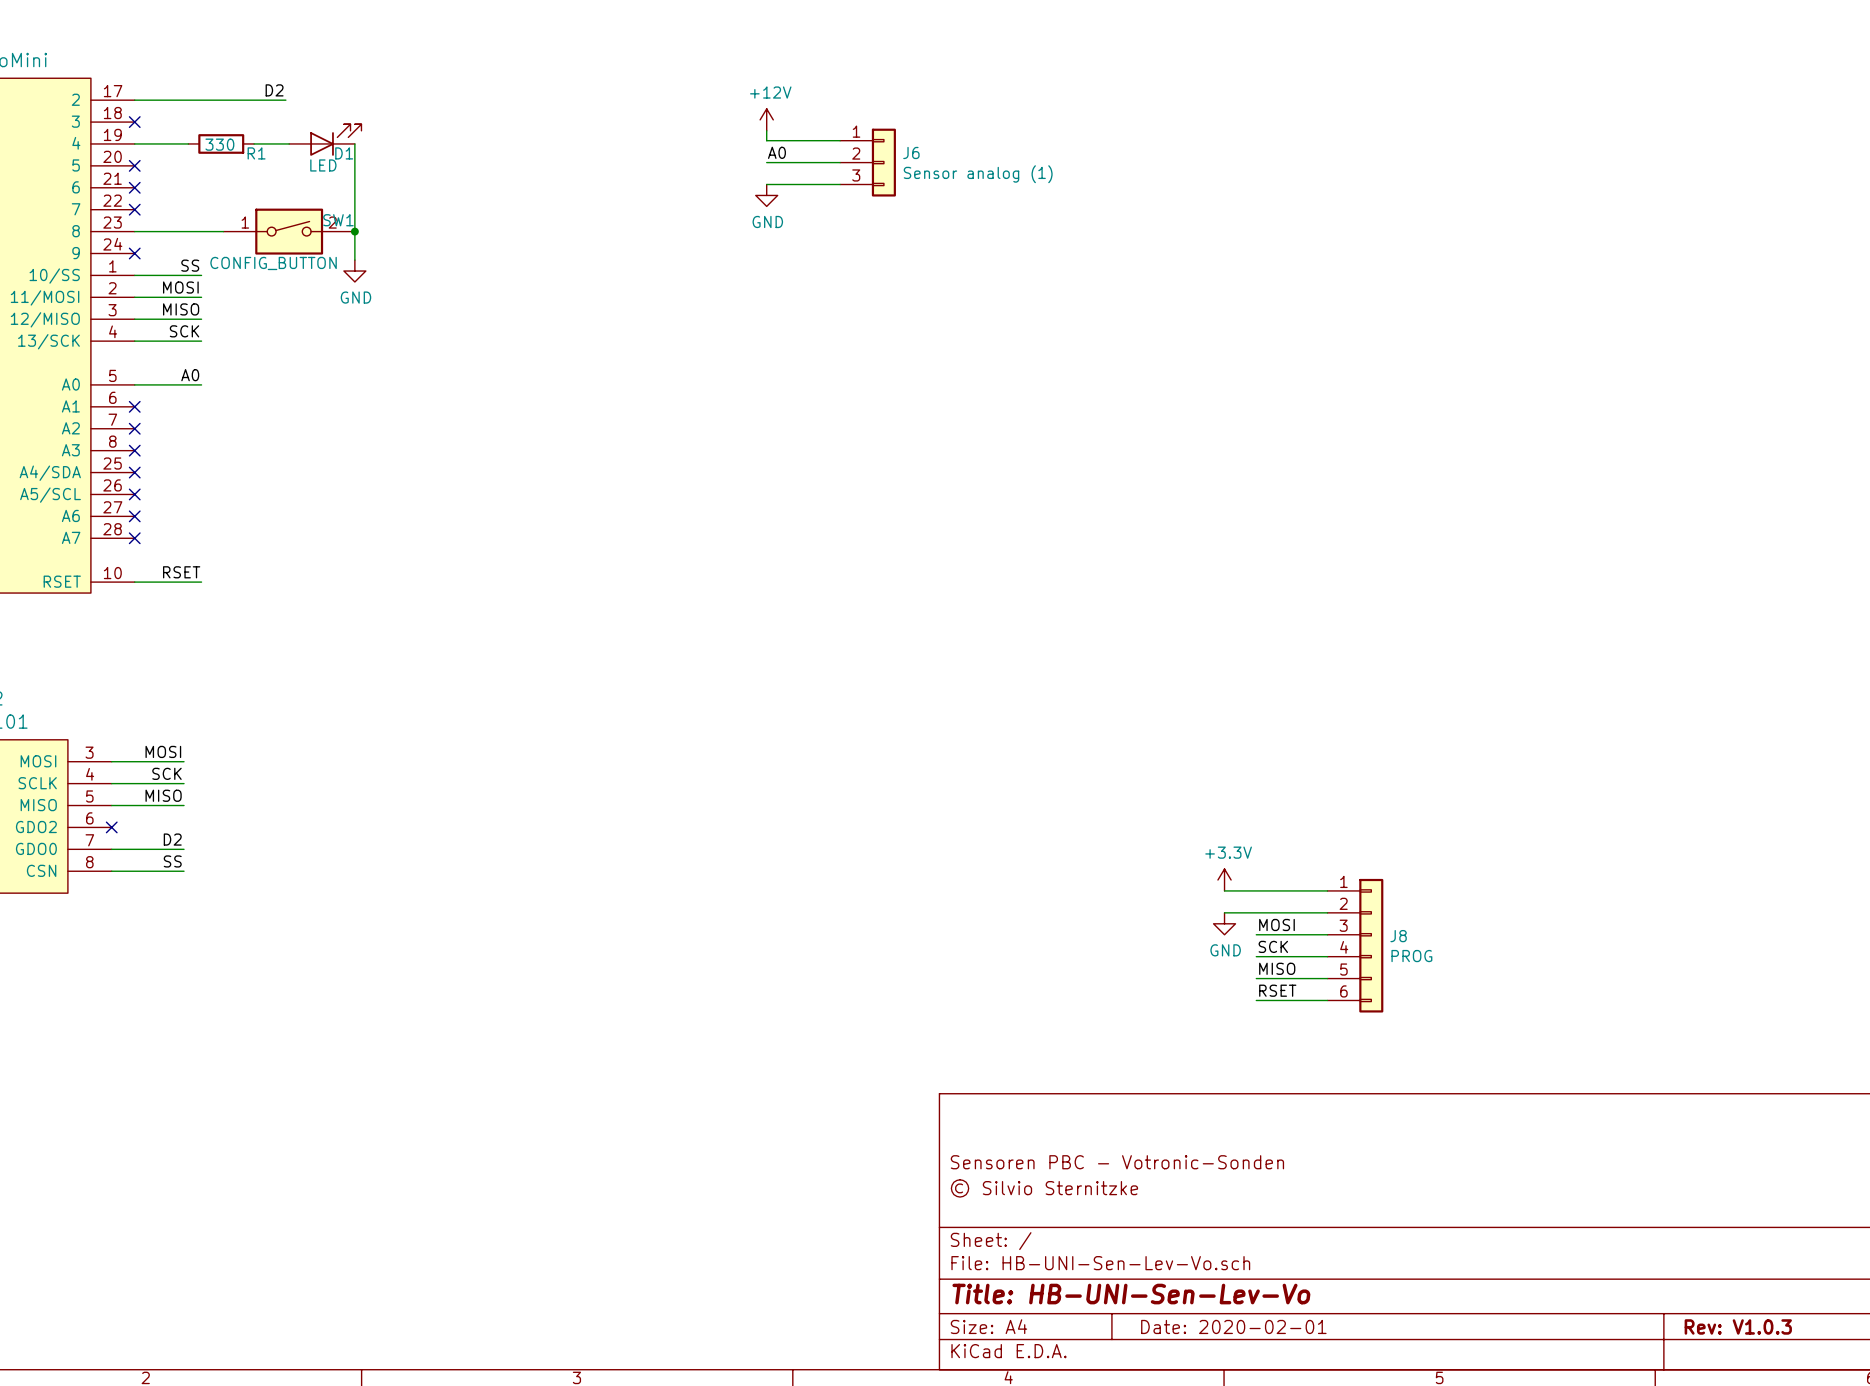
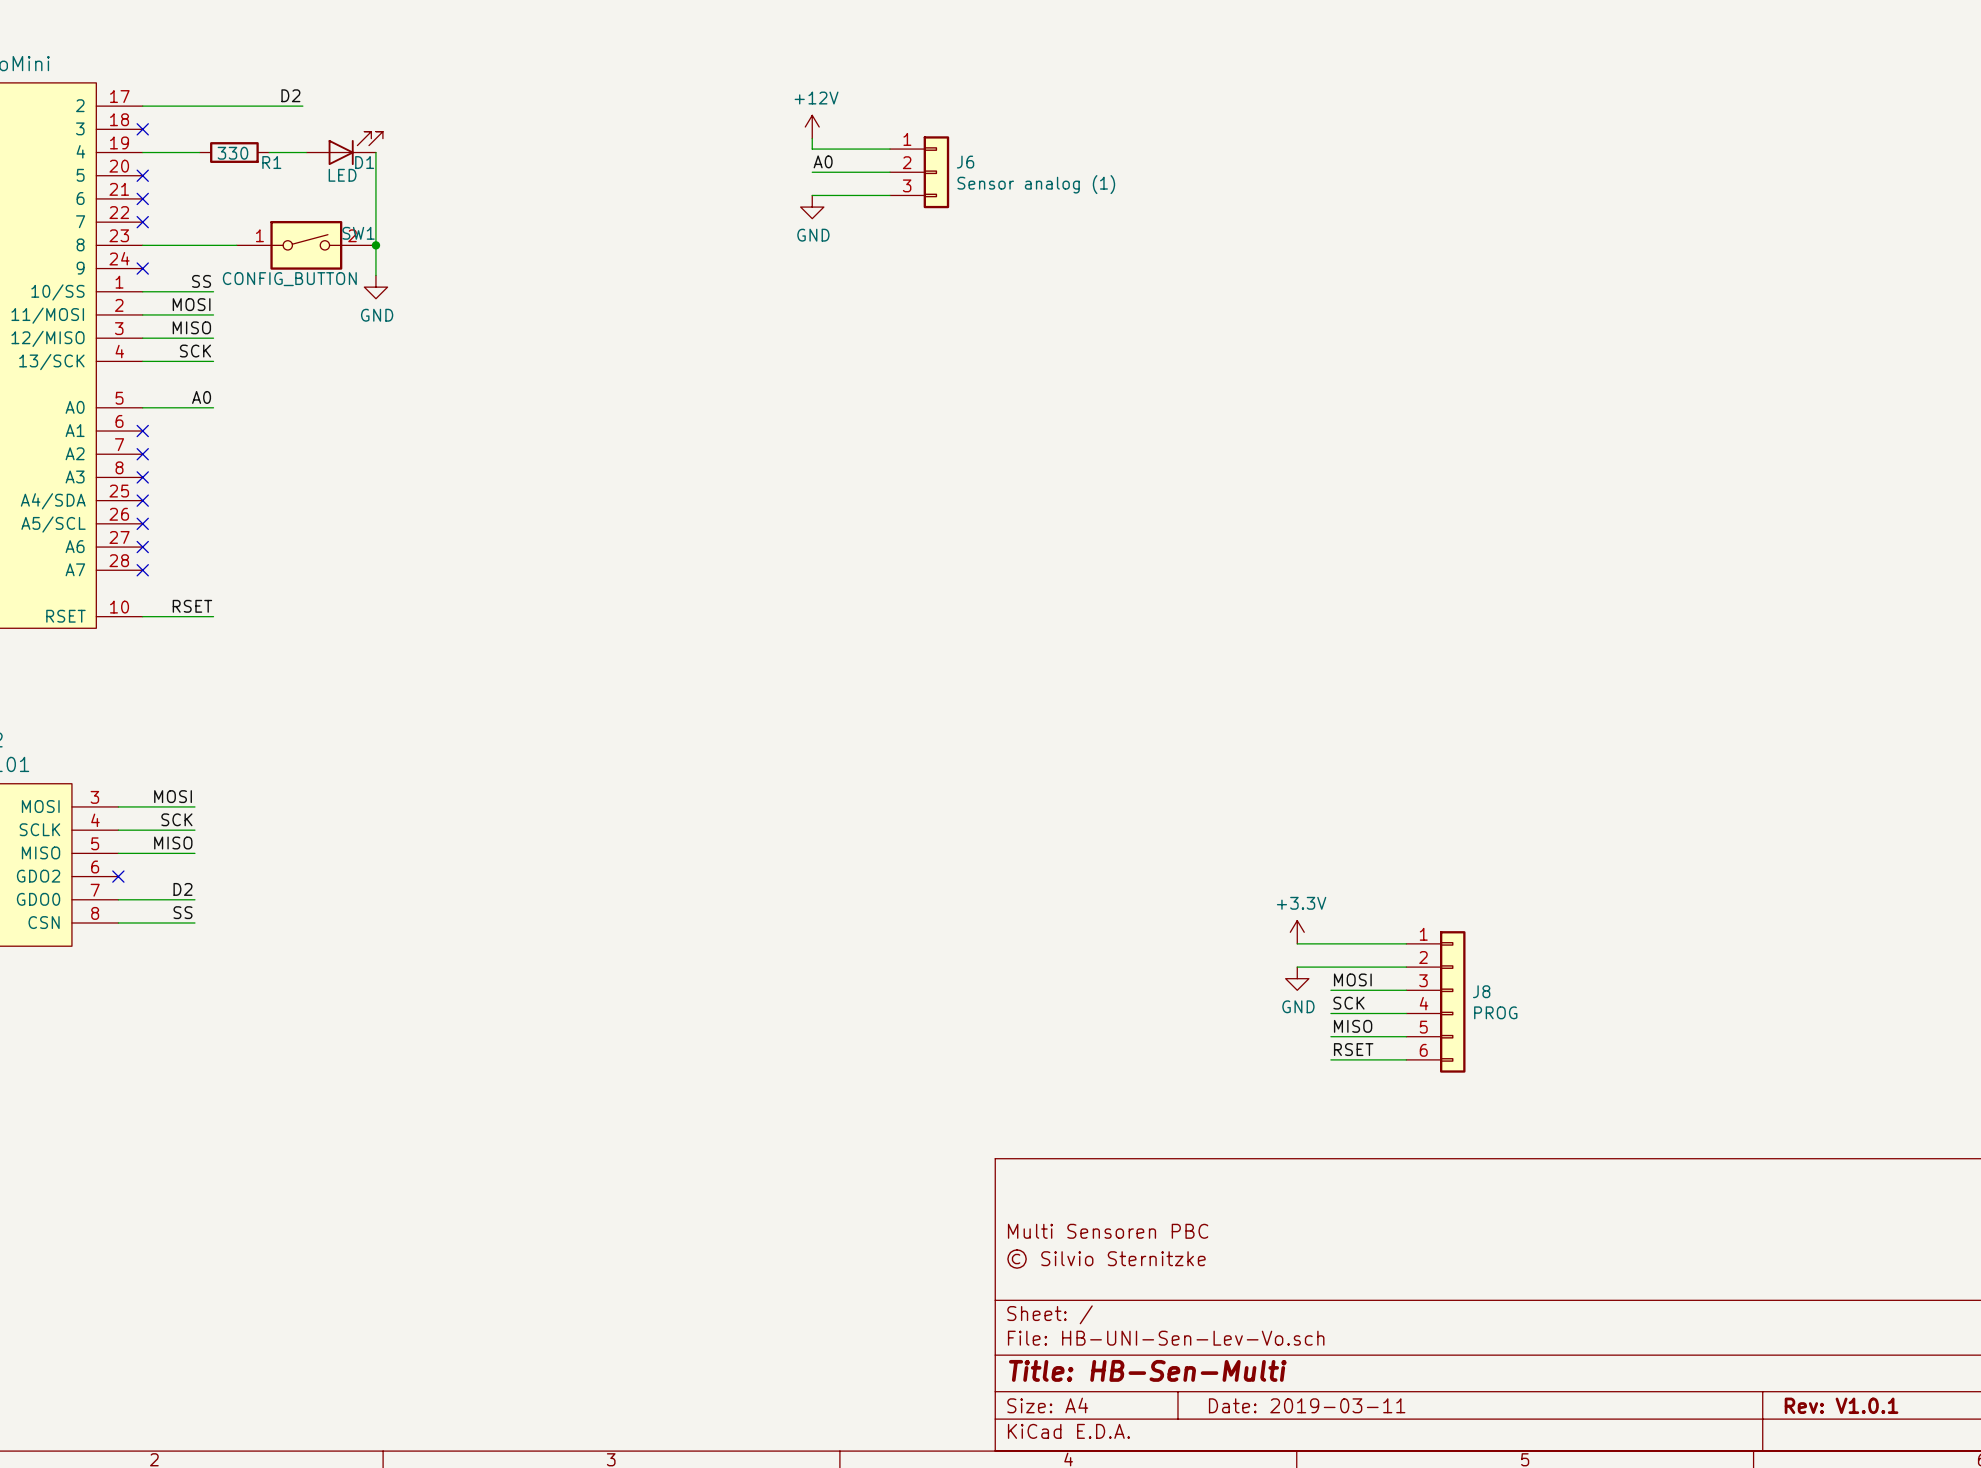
title block: Sensoren PBC - Votronic-Sonden (1117, 1162) -> Multi Sensoren PBC (1108, 1231)
title block: Title: HB-UNI-Sen-Lev-Vo (1131, 1294) -> Title: HB-Sen-Multi (1147, 1370)
title block: Date: 2020-02-01 (1233, 1326) -> Date: 2019-03-11 (1307, 1405)
title block: Rev: V1.0.3 (1738, 1326) -> Rev: V1.0.1 (1841, 1405)

